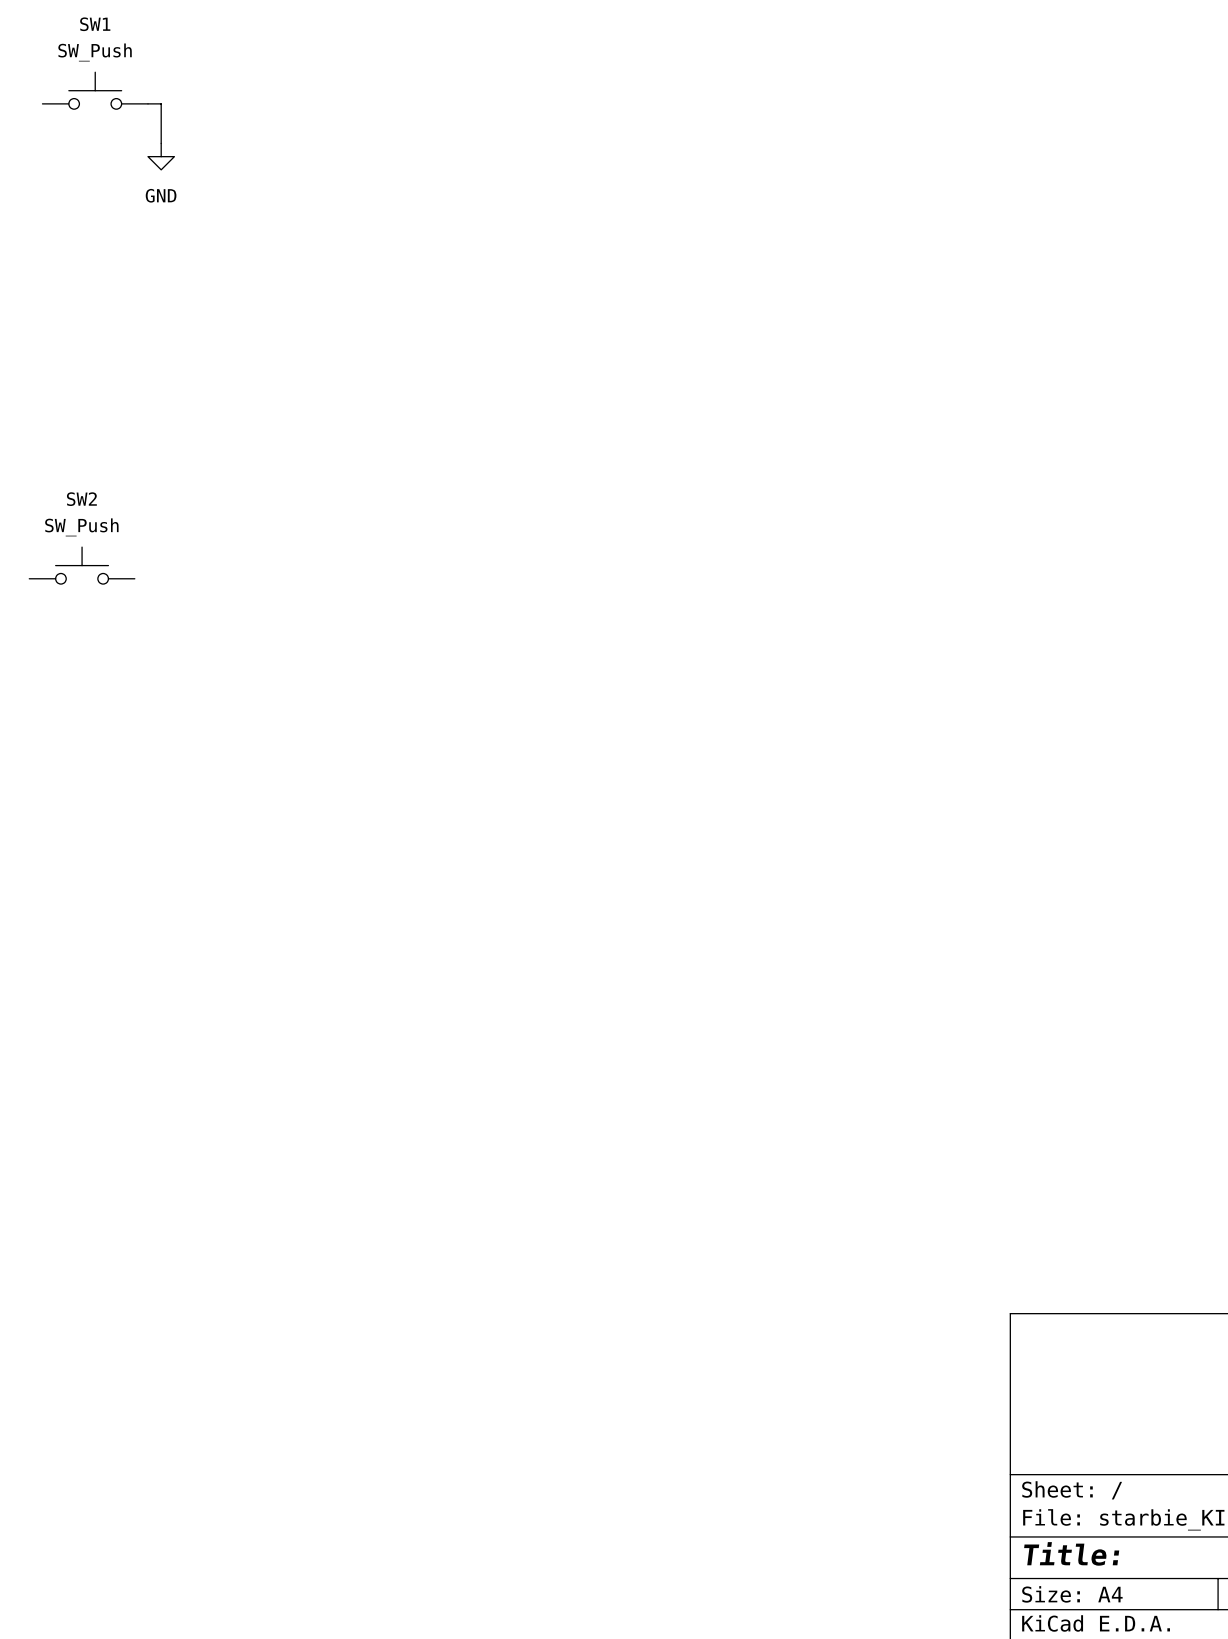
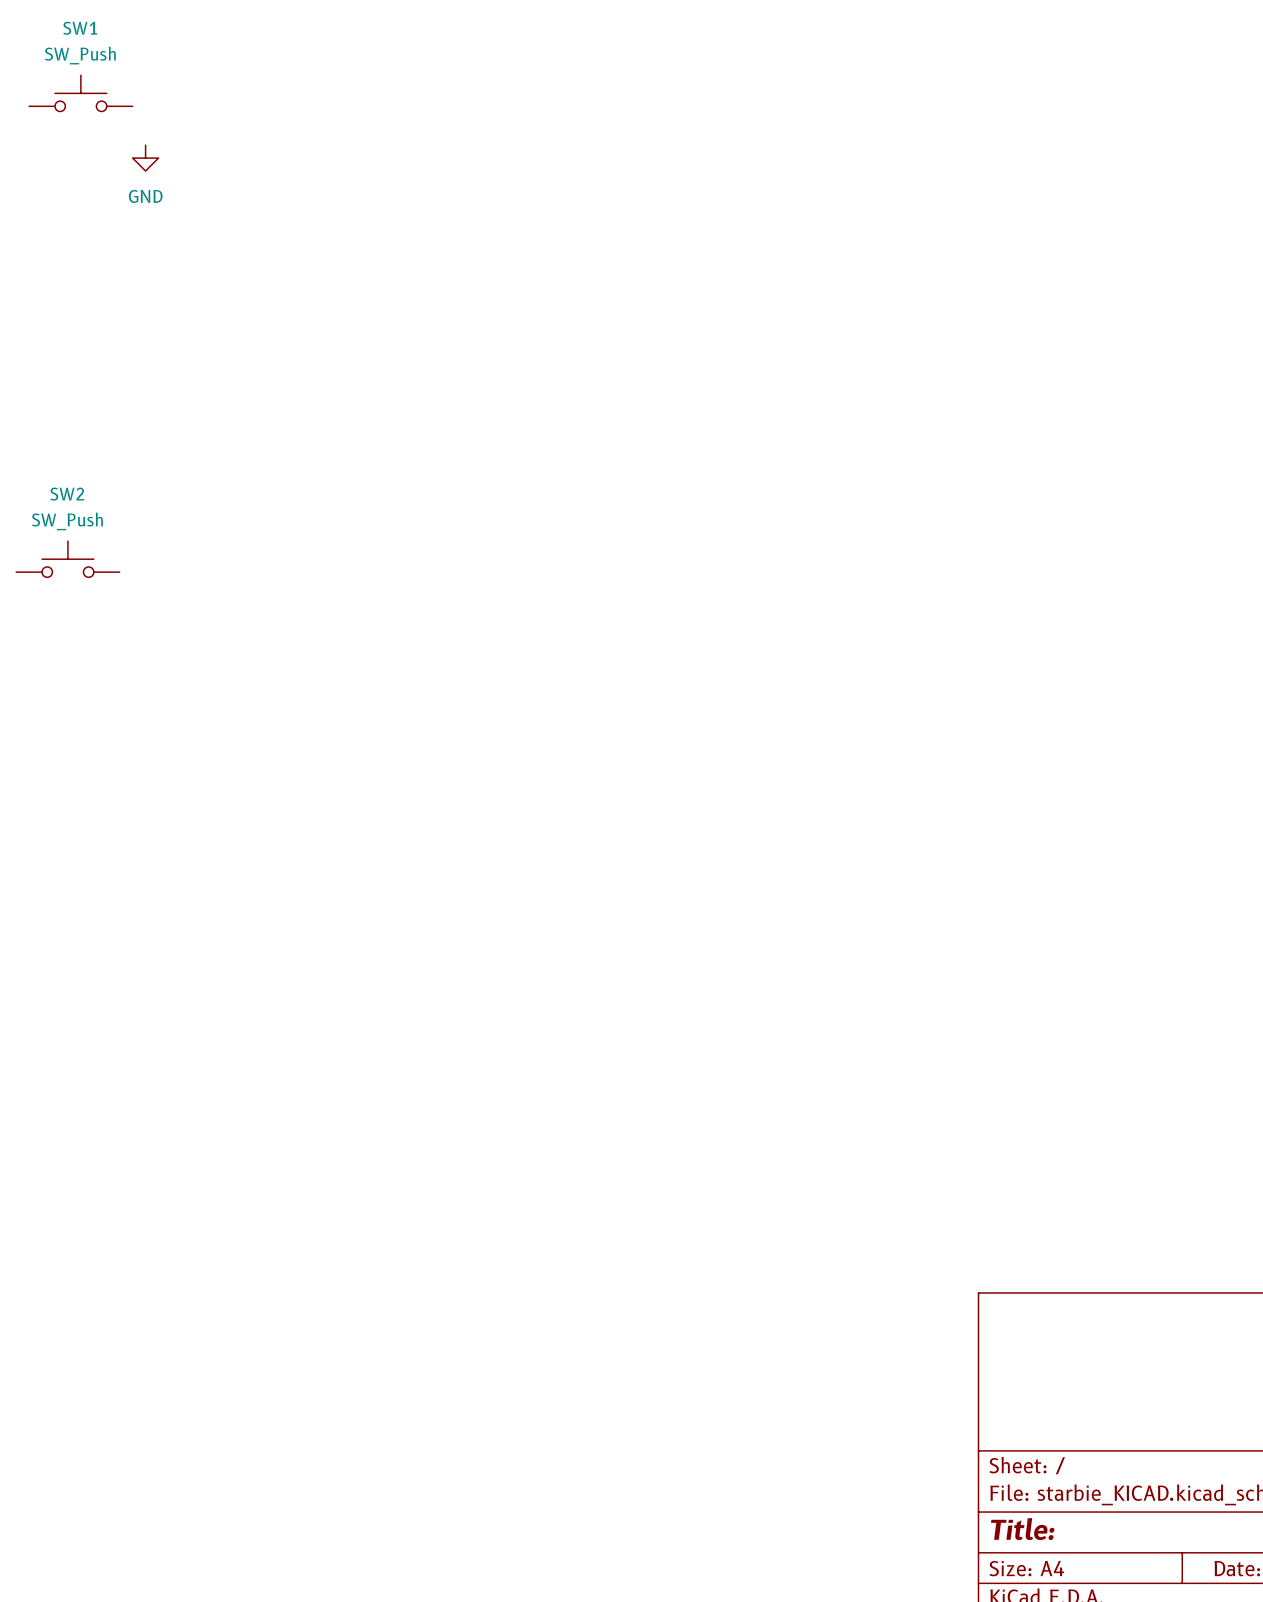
wire: (148, 103) (161, 103) (161, 143) -> none

